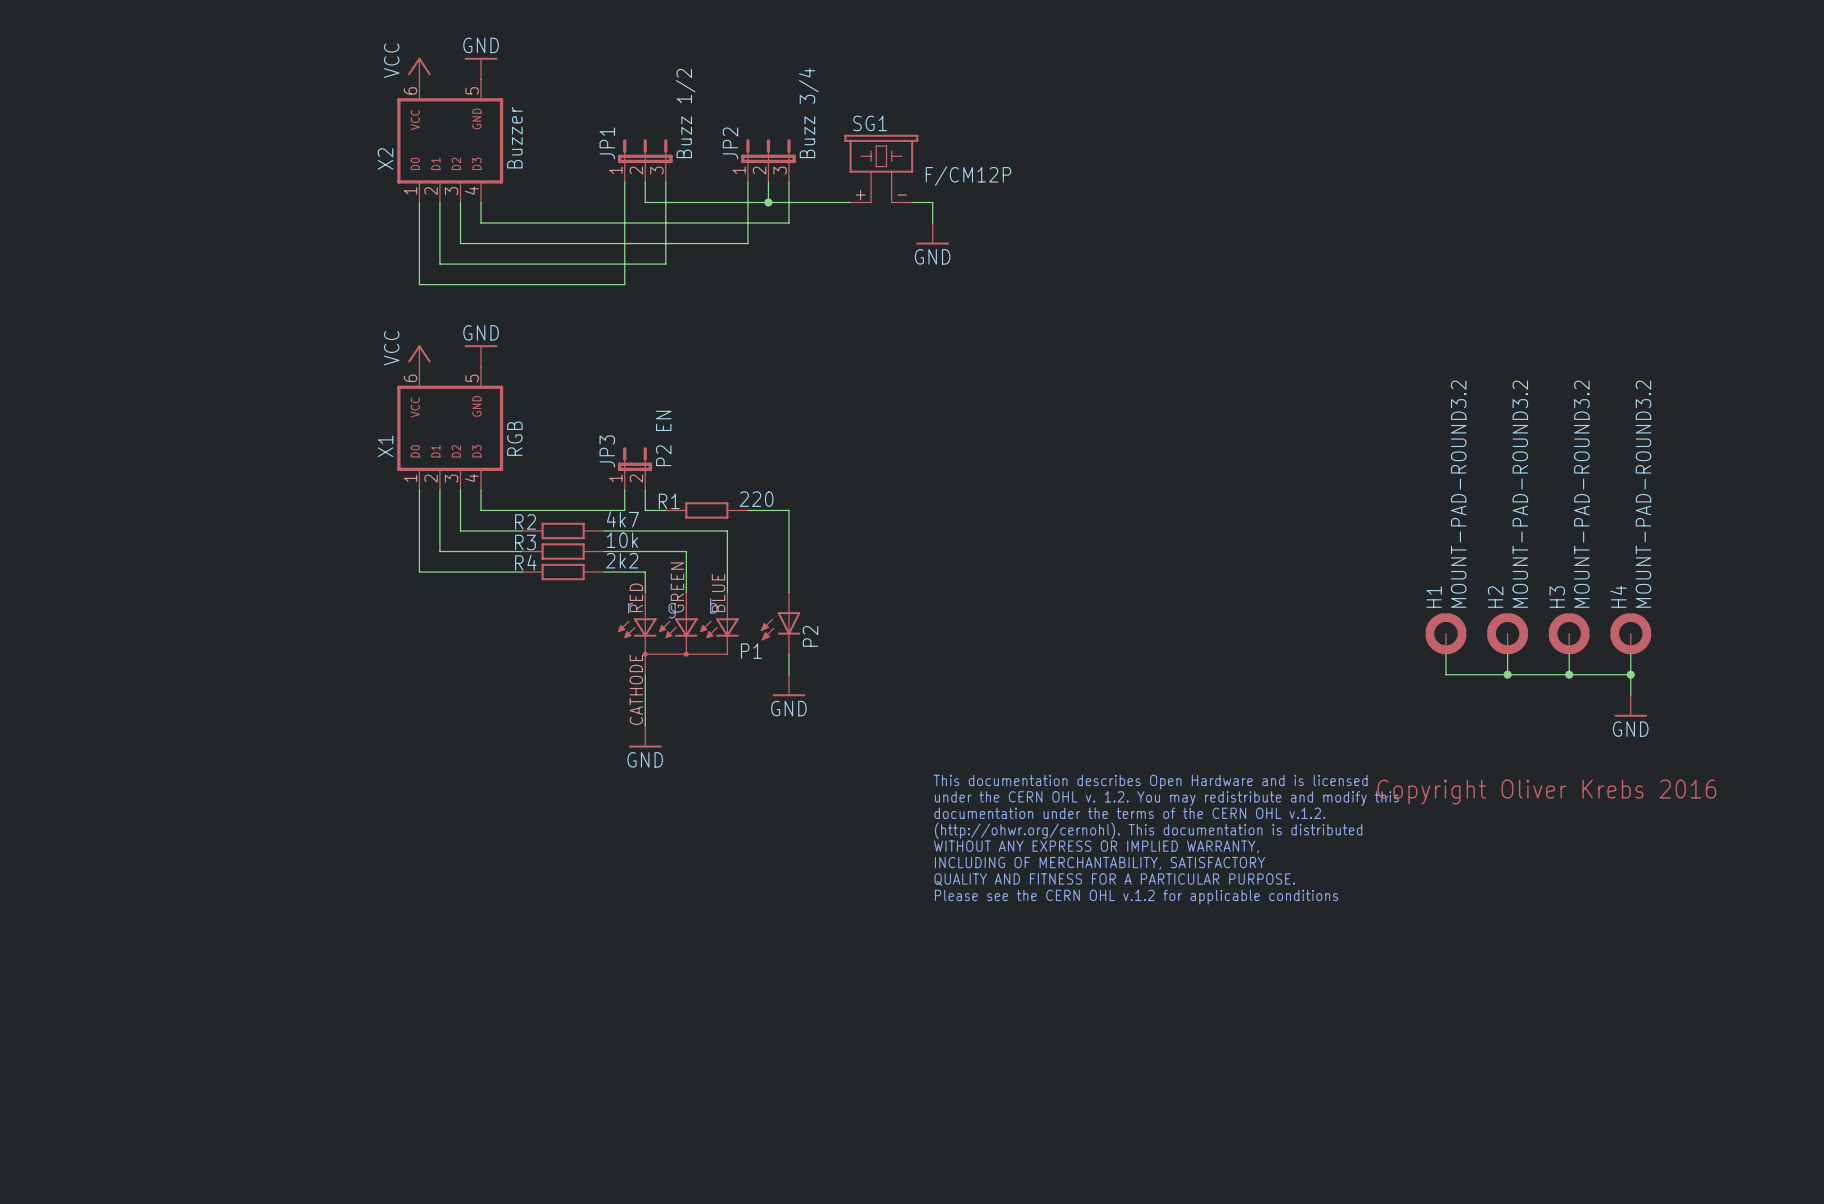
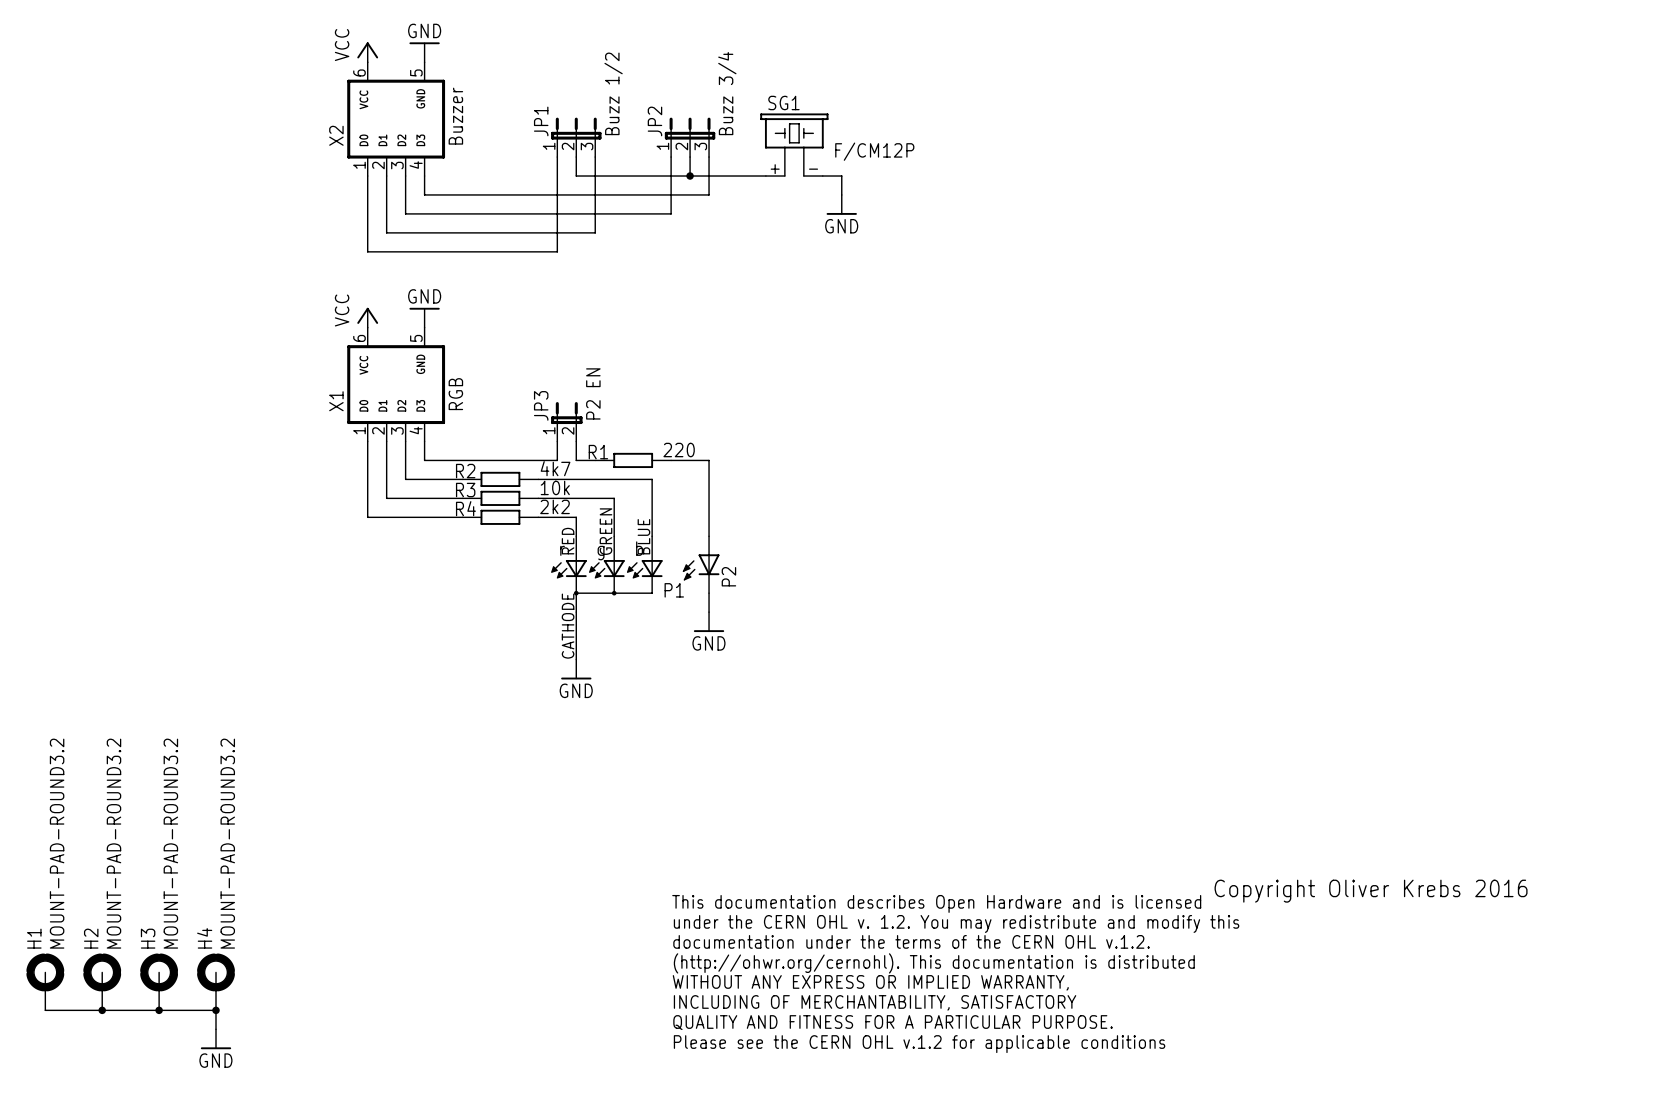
H1 position: (1445, 633) -> (45, 972)
H2 position: (1507, 633) -> (102, 972)
H3 position: (1569, 633) -> (159, 972)
H4 position: (1630, 633) -> (216, 972)
wire: (1445, 654) (1445, 674) (1630, 674) -> none
wire: (1507, 654) (1507, 674) -> none
wire: (1569, 654) (1569, 674) -> none
wire: (1630, 654) (1630, 695) -> none
junction: (1507, 674) -> none
junction: (1569, 674) -> none
junction: (1630, 674) -> none
power symbol: GND (1630, 706) -> none
text: This documentation describes Open Hardware and is licensed (1150, 782) -> none
text position: Copyright Oliver Krebs 2016 (1546, 792) -> Copyright Oliver Krebs 2016 (1371, 891)
text: under the CERN OHL v. 1.2. You may redistribute and modify this (1166, 798) -> none
text: documentation under the terms of the CERN OHL v.1.2. (1129, 813) -> none
text: (http://ohwr.org/cernohl). This documentation is distributed (1148, 830) -> none
text: WITHOUT ANY EXPRESS OR IMPLIED WARRANTY, (1096, 846) -> none
text: INCLUDING OF MERCHANTABILITY, SATISFACTORY (1099, 863) -> none
text: QUALITY AND FITNESS FOR A PARTICULAR PURPOSE. (1114, 879) -> none
text: Please see the CERN OHL v.1.2 for applicable conditions (1136, 897) -> none
text: none -> This documentation describes Open Hardware and is licensed (936, 903)
text: none -> under the CERN OHL v. 1.2. You may redistribute and modify this (956, 923)
text: none -> documentation under the terms of the CERN OHL v.1.2. (911, 941)
text: none -> (http://ohwr.org/cernohl). This documentation is distributed (934, 963)
text: none -> WITHOUT ANY EXPRESS OR IMPLIED WARRANTY, (870, 982)
wire: none -> (45, 991) (45, 1010) (216, 1010)
wire: none -> (102, 991) (102, 1010)
wire: none -> (159, 991) (159, 1010)
wire: none -> (216, 991) (216, 1029)
text: none -> INCLUDING OF MERCHANTABILITY, SATISFACTORY (875, 1002)
junction: none -> (102, 1010)
junction: none -> (159, 1010)
junction: none -> (216, 1010)
text: none -> QUALITY AND FITNESS FOR A PARTICULAR PURPOSE. (893, 1022)
power symbol: none -> GND (216, 1039)
text: none -> Please see the CERN OHL v.1.2 for applicable conditions (919, 1044)

